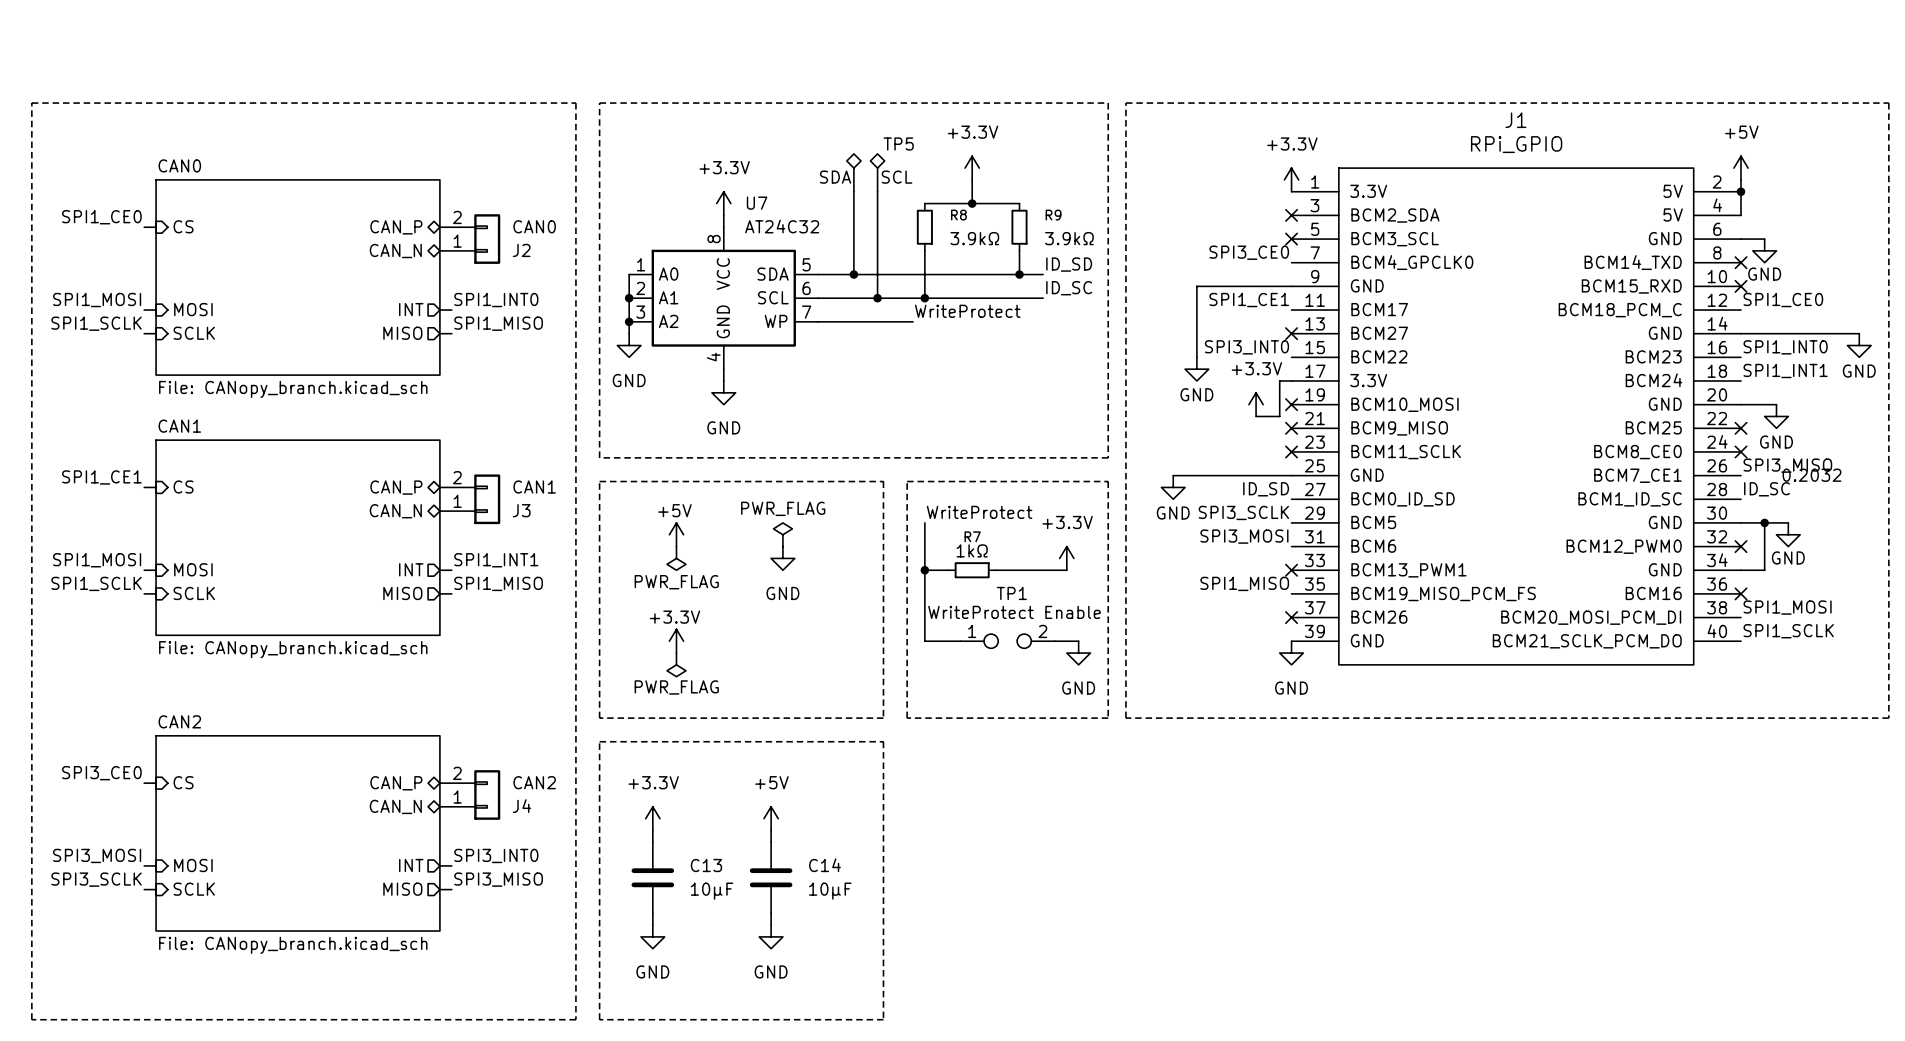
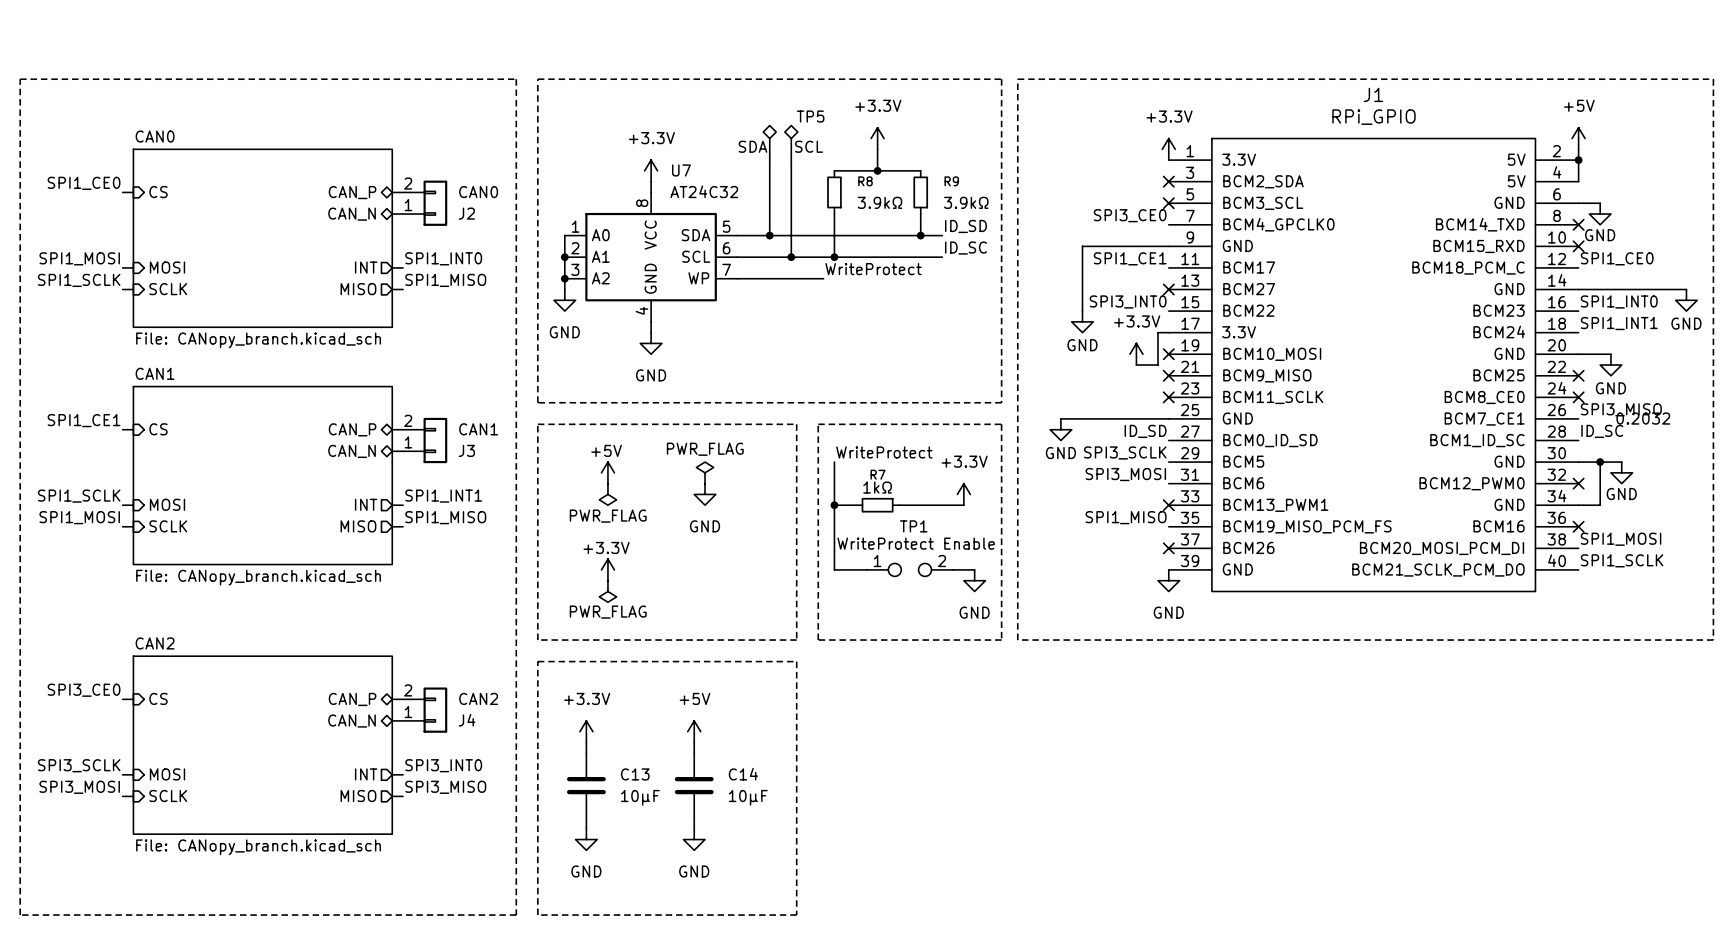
label: SPI1_MOSI (97, 560) -> SPI1_SCLK (79, 496)
label: SPI1_SCLK (96, 583) -> SPI1_MOSI (79, 517)
label: SPI3_MOSI (97, 855) -> SPI3_SCLK (79, 765)
label: SPI3_SCLK (96, 879) -> SPI3_MOSI (79, 787)

